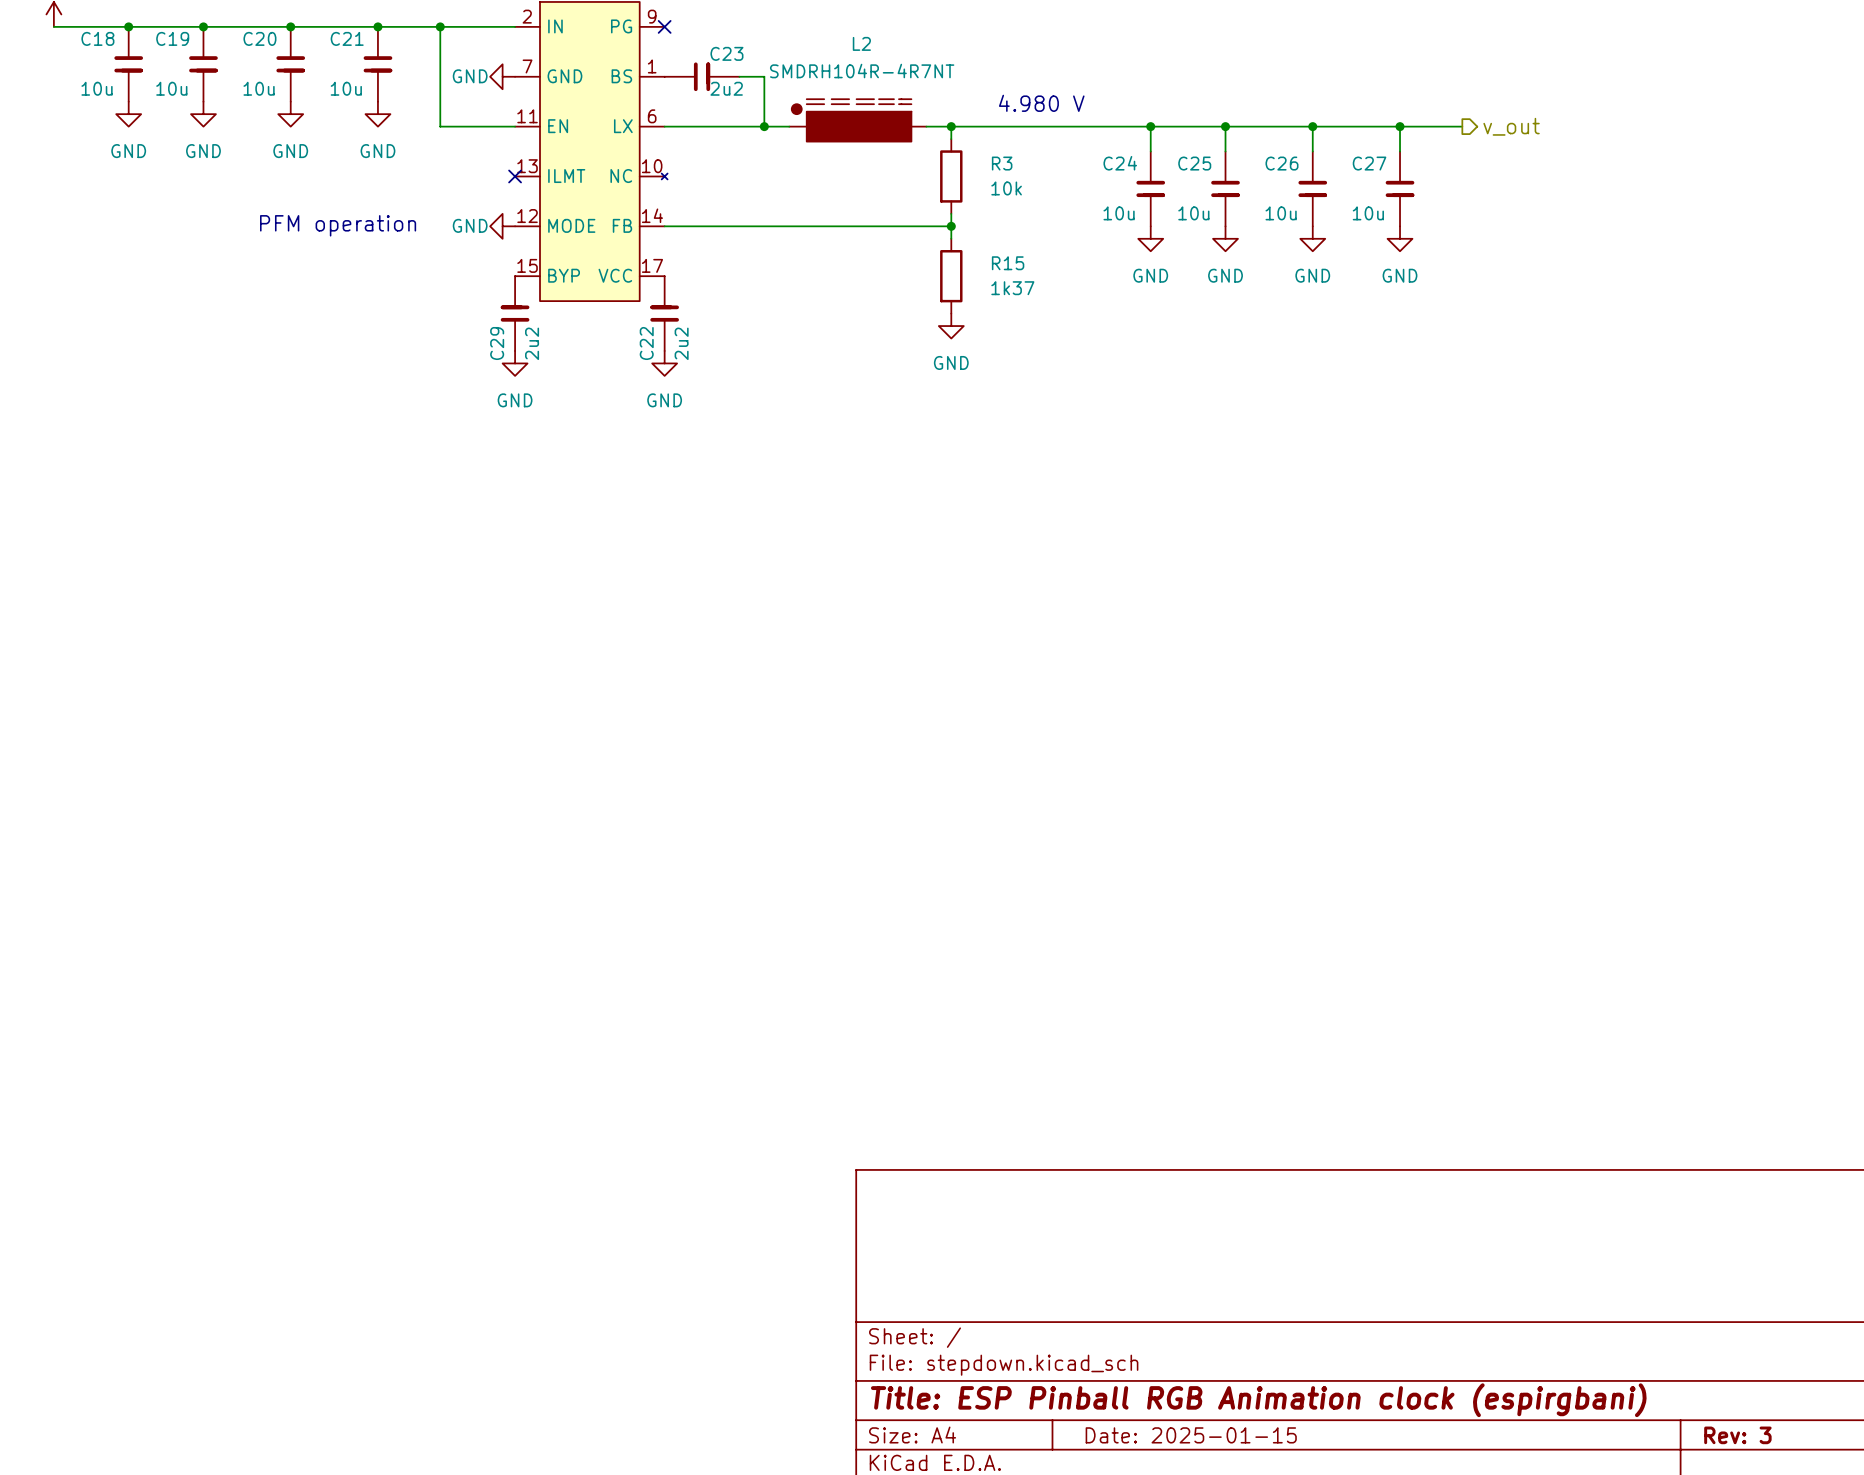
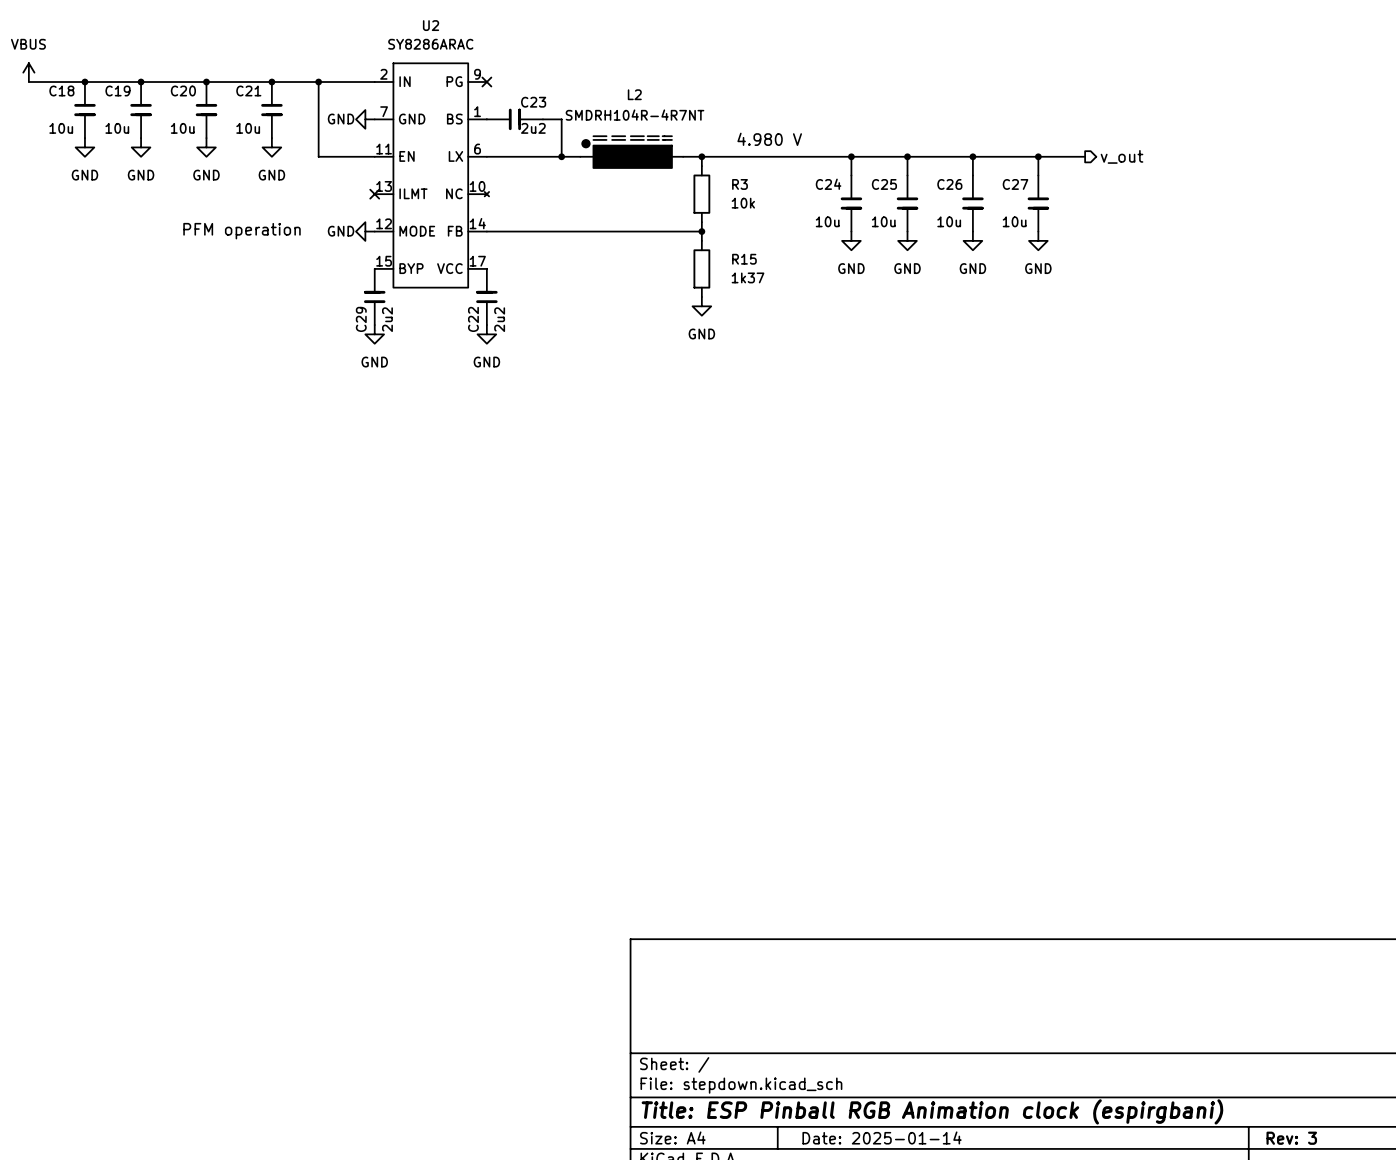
title block: Date: 2025-01-15 (1191, 1435) -> Date: 2025-01-14 (882, 1137)

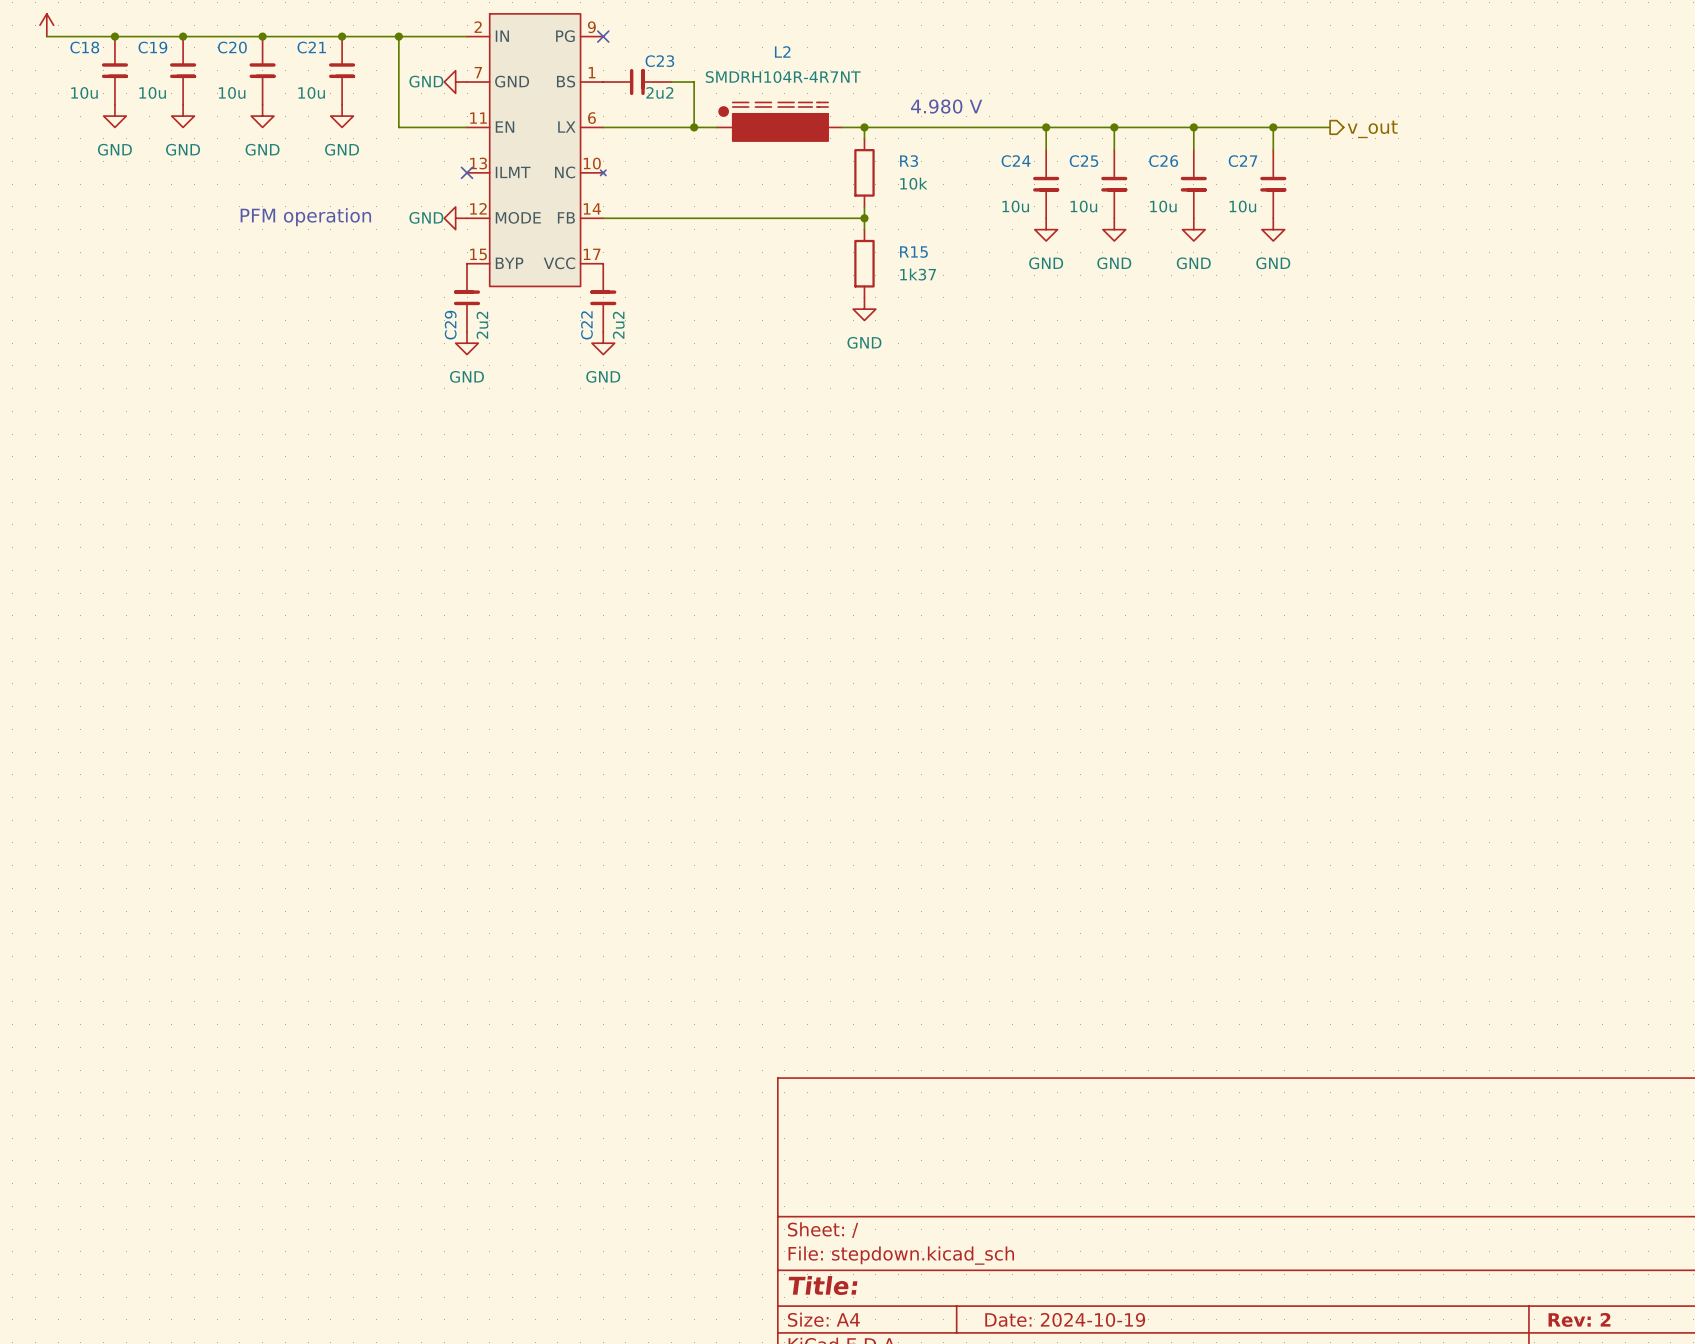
title block: Title: ESP Pinball RGB Animation clock (espirgbani) (932, 1111) -> Title: (823, 1285)
title block: Date: 2025-01-14 (882, 1137) -> Date: 2024-10-19 (1065, 1319)
title block: Rev: 3 (1291, 1138) -> Rev: 2 (1579, 1319)

